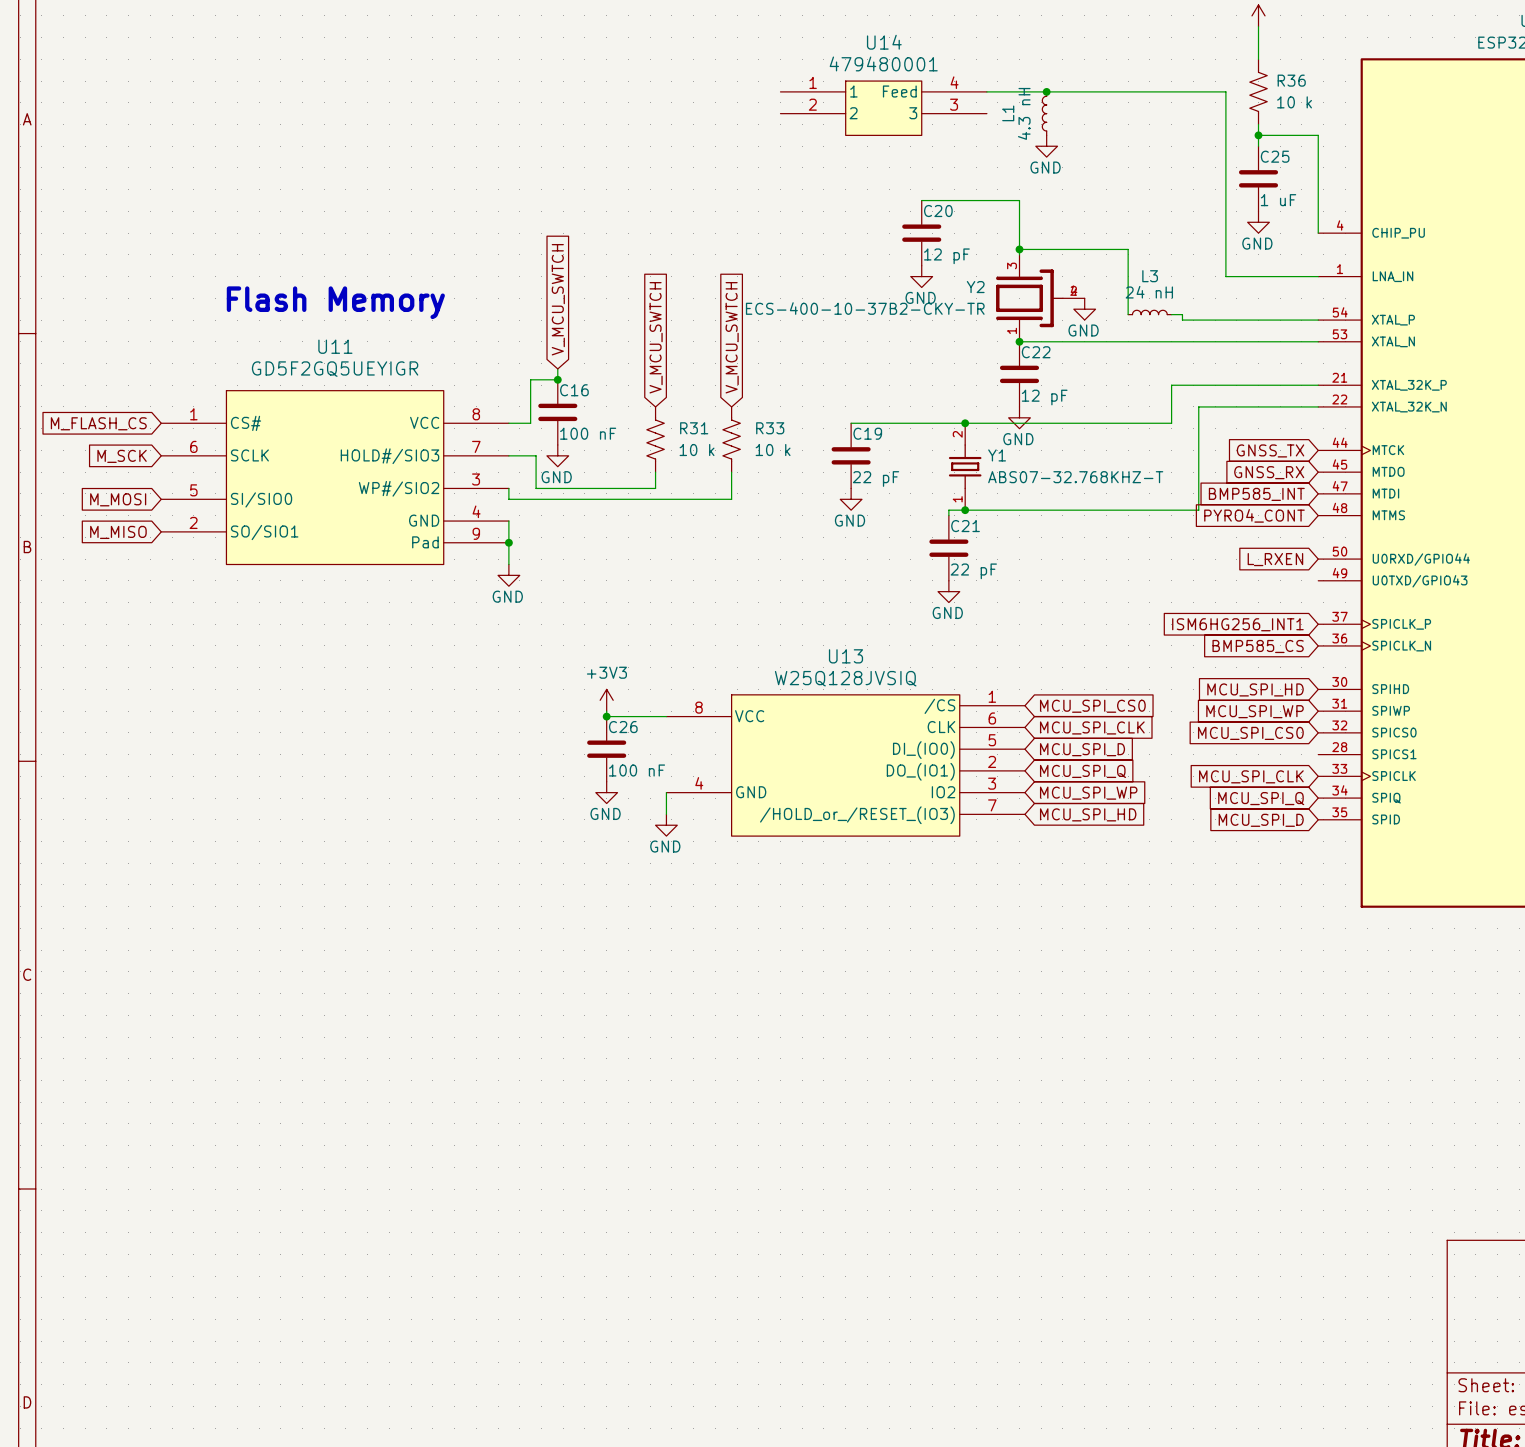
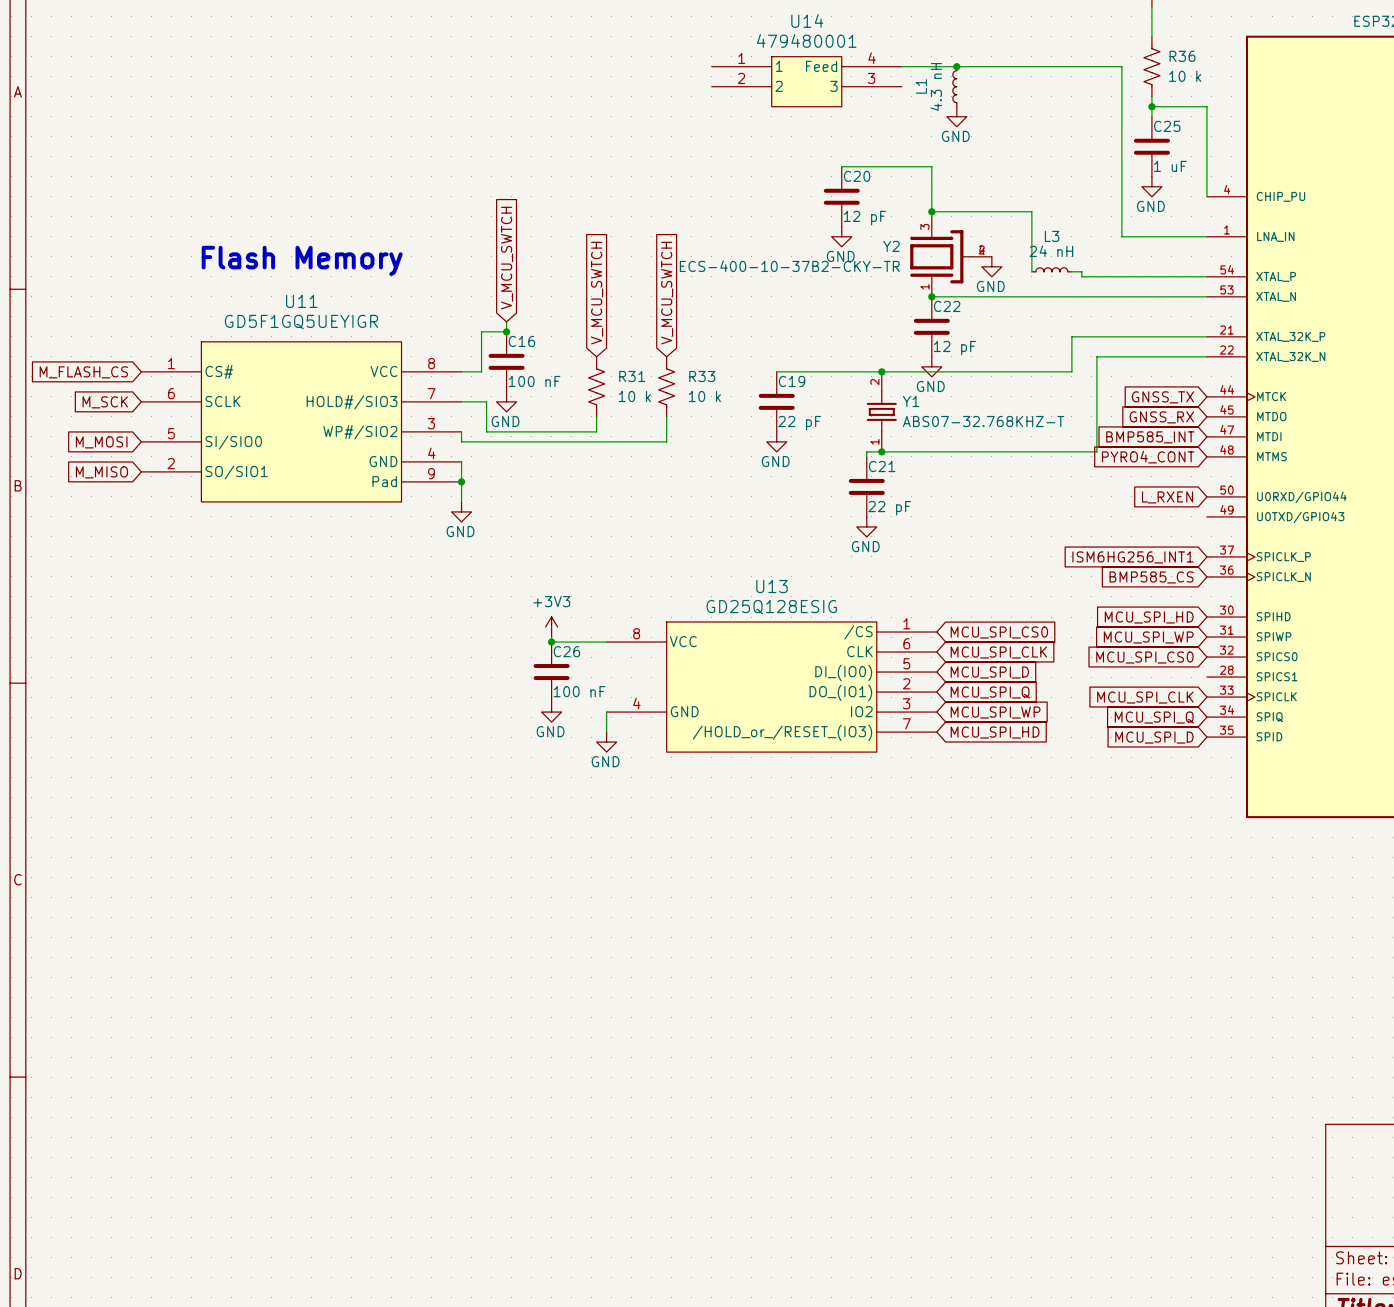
U11 value: GD5F2GQ5UEYIGR (335, 369) -> GD5F1GQ5UEYIGR (301, 321)
U13 value: W25Q128JVSIQ (845, 678) -> GD25Q128ESIG (771, 607)

